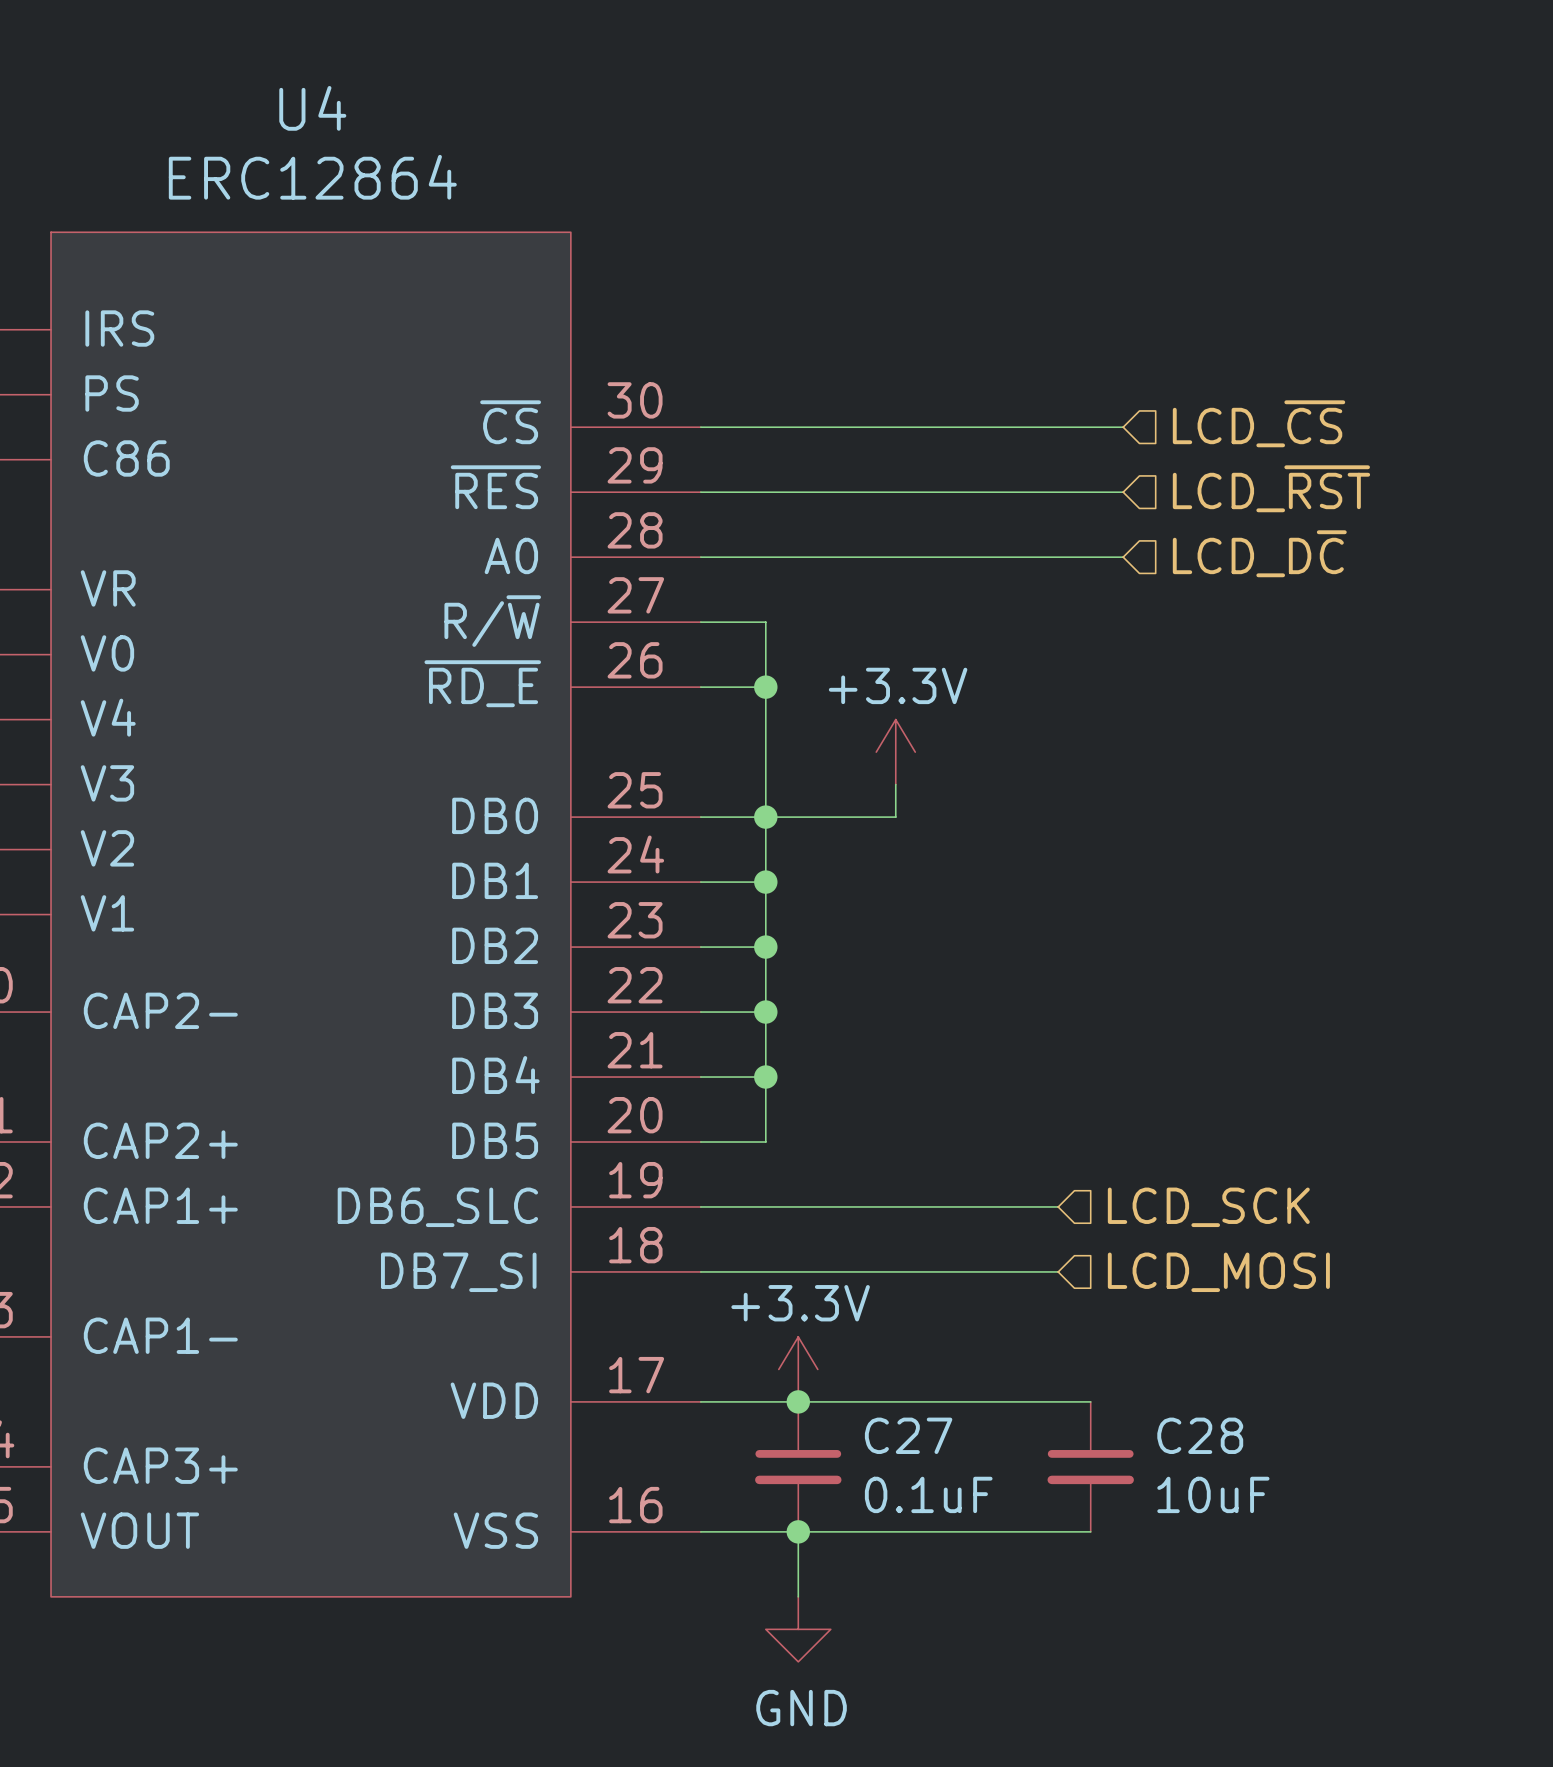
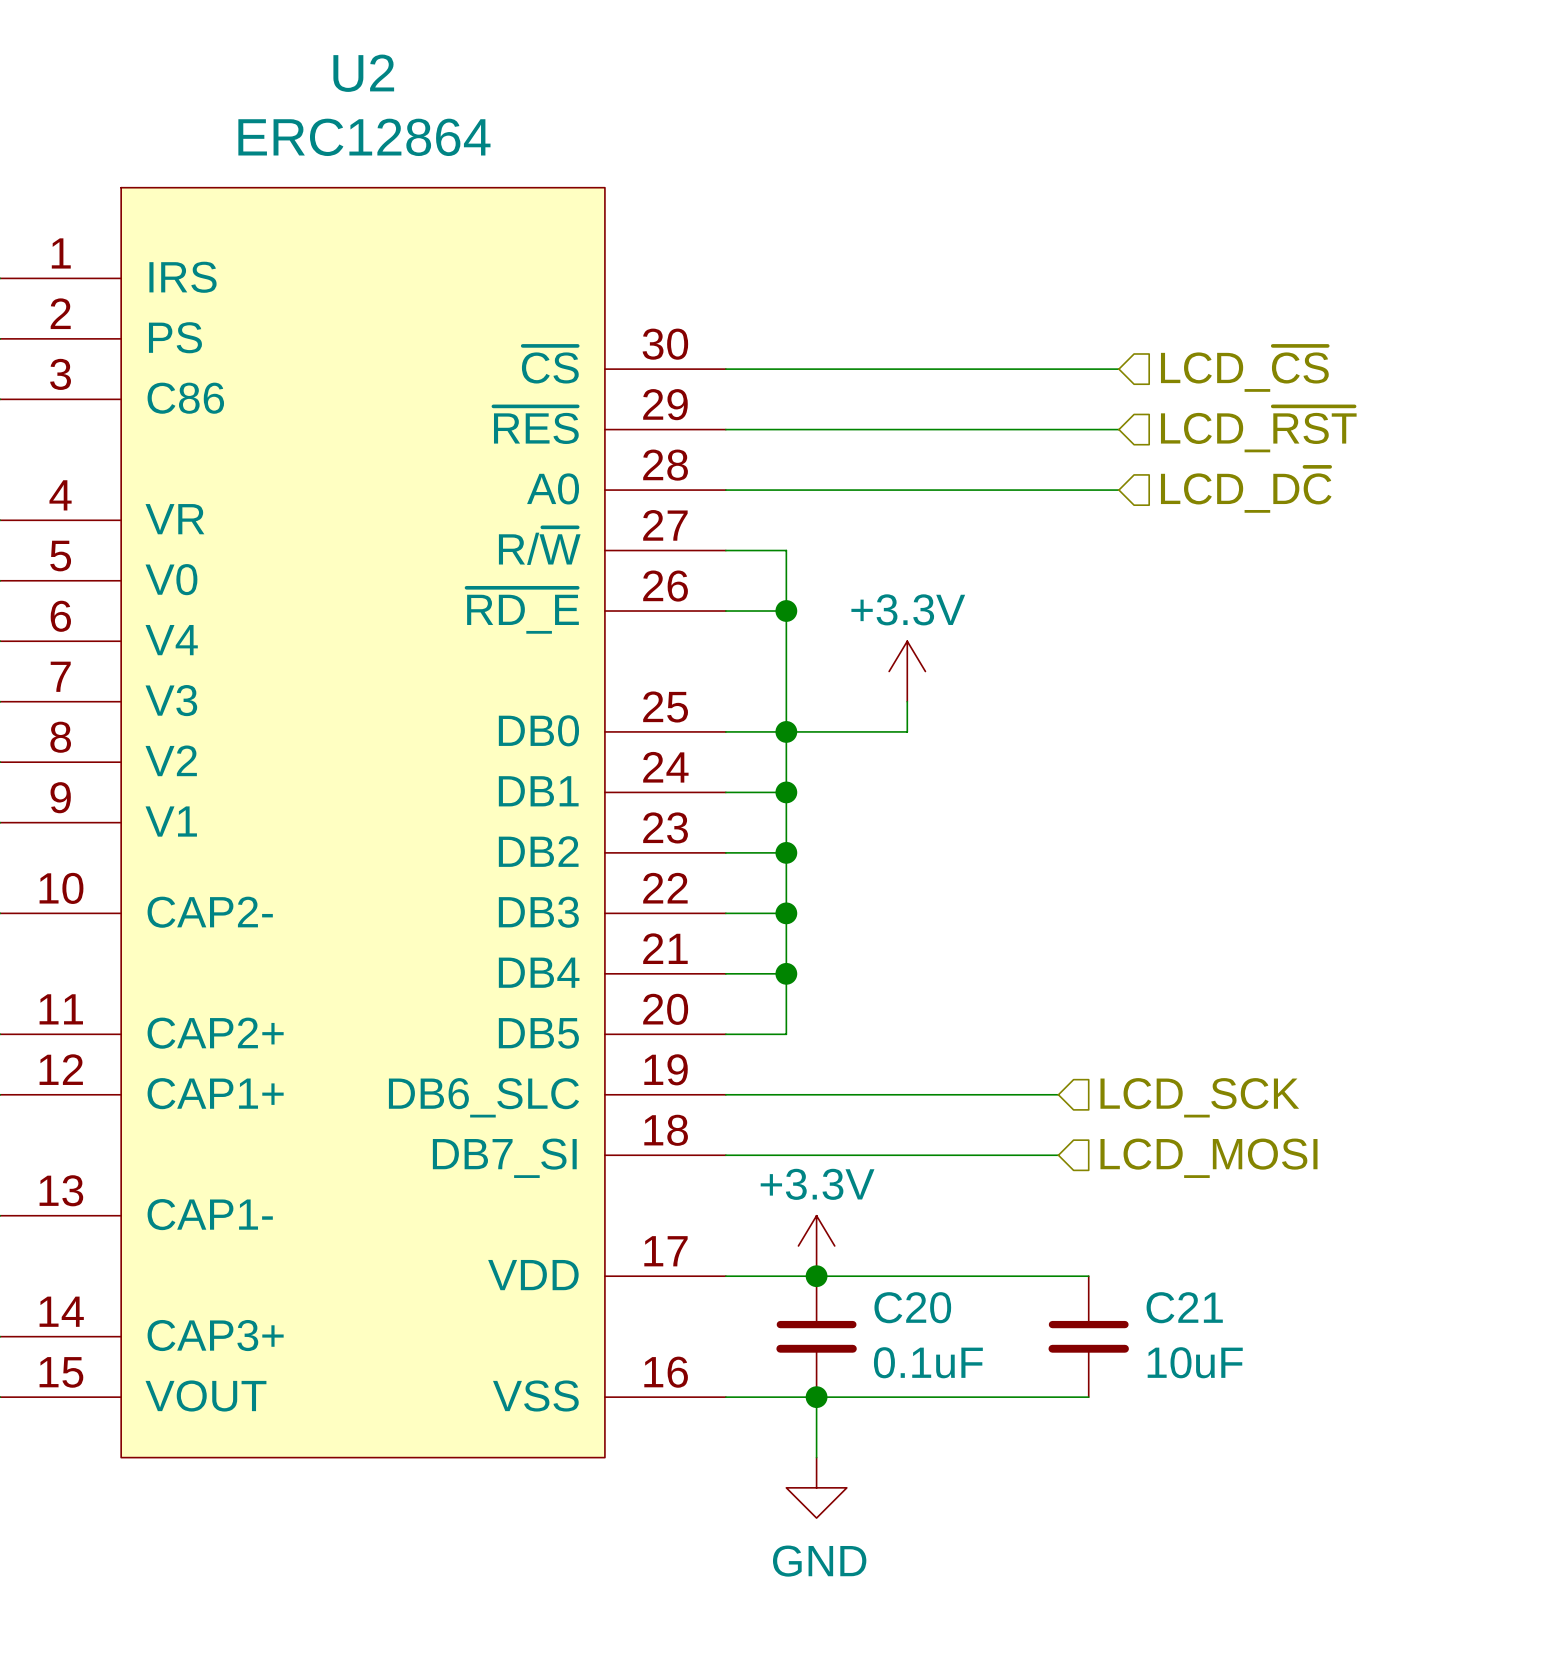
U4 name: U4 (312, 108) -> U2 (363, 73)
C27 name: C27 (908, 1435) -> C20 (912, 1307)
C28 name: C28 (1200, 1435) -> C21 (1184, 1307)

